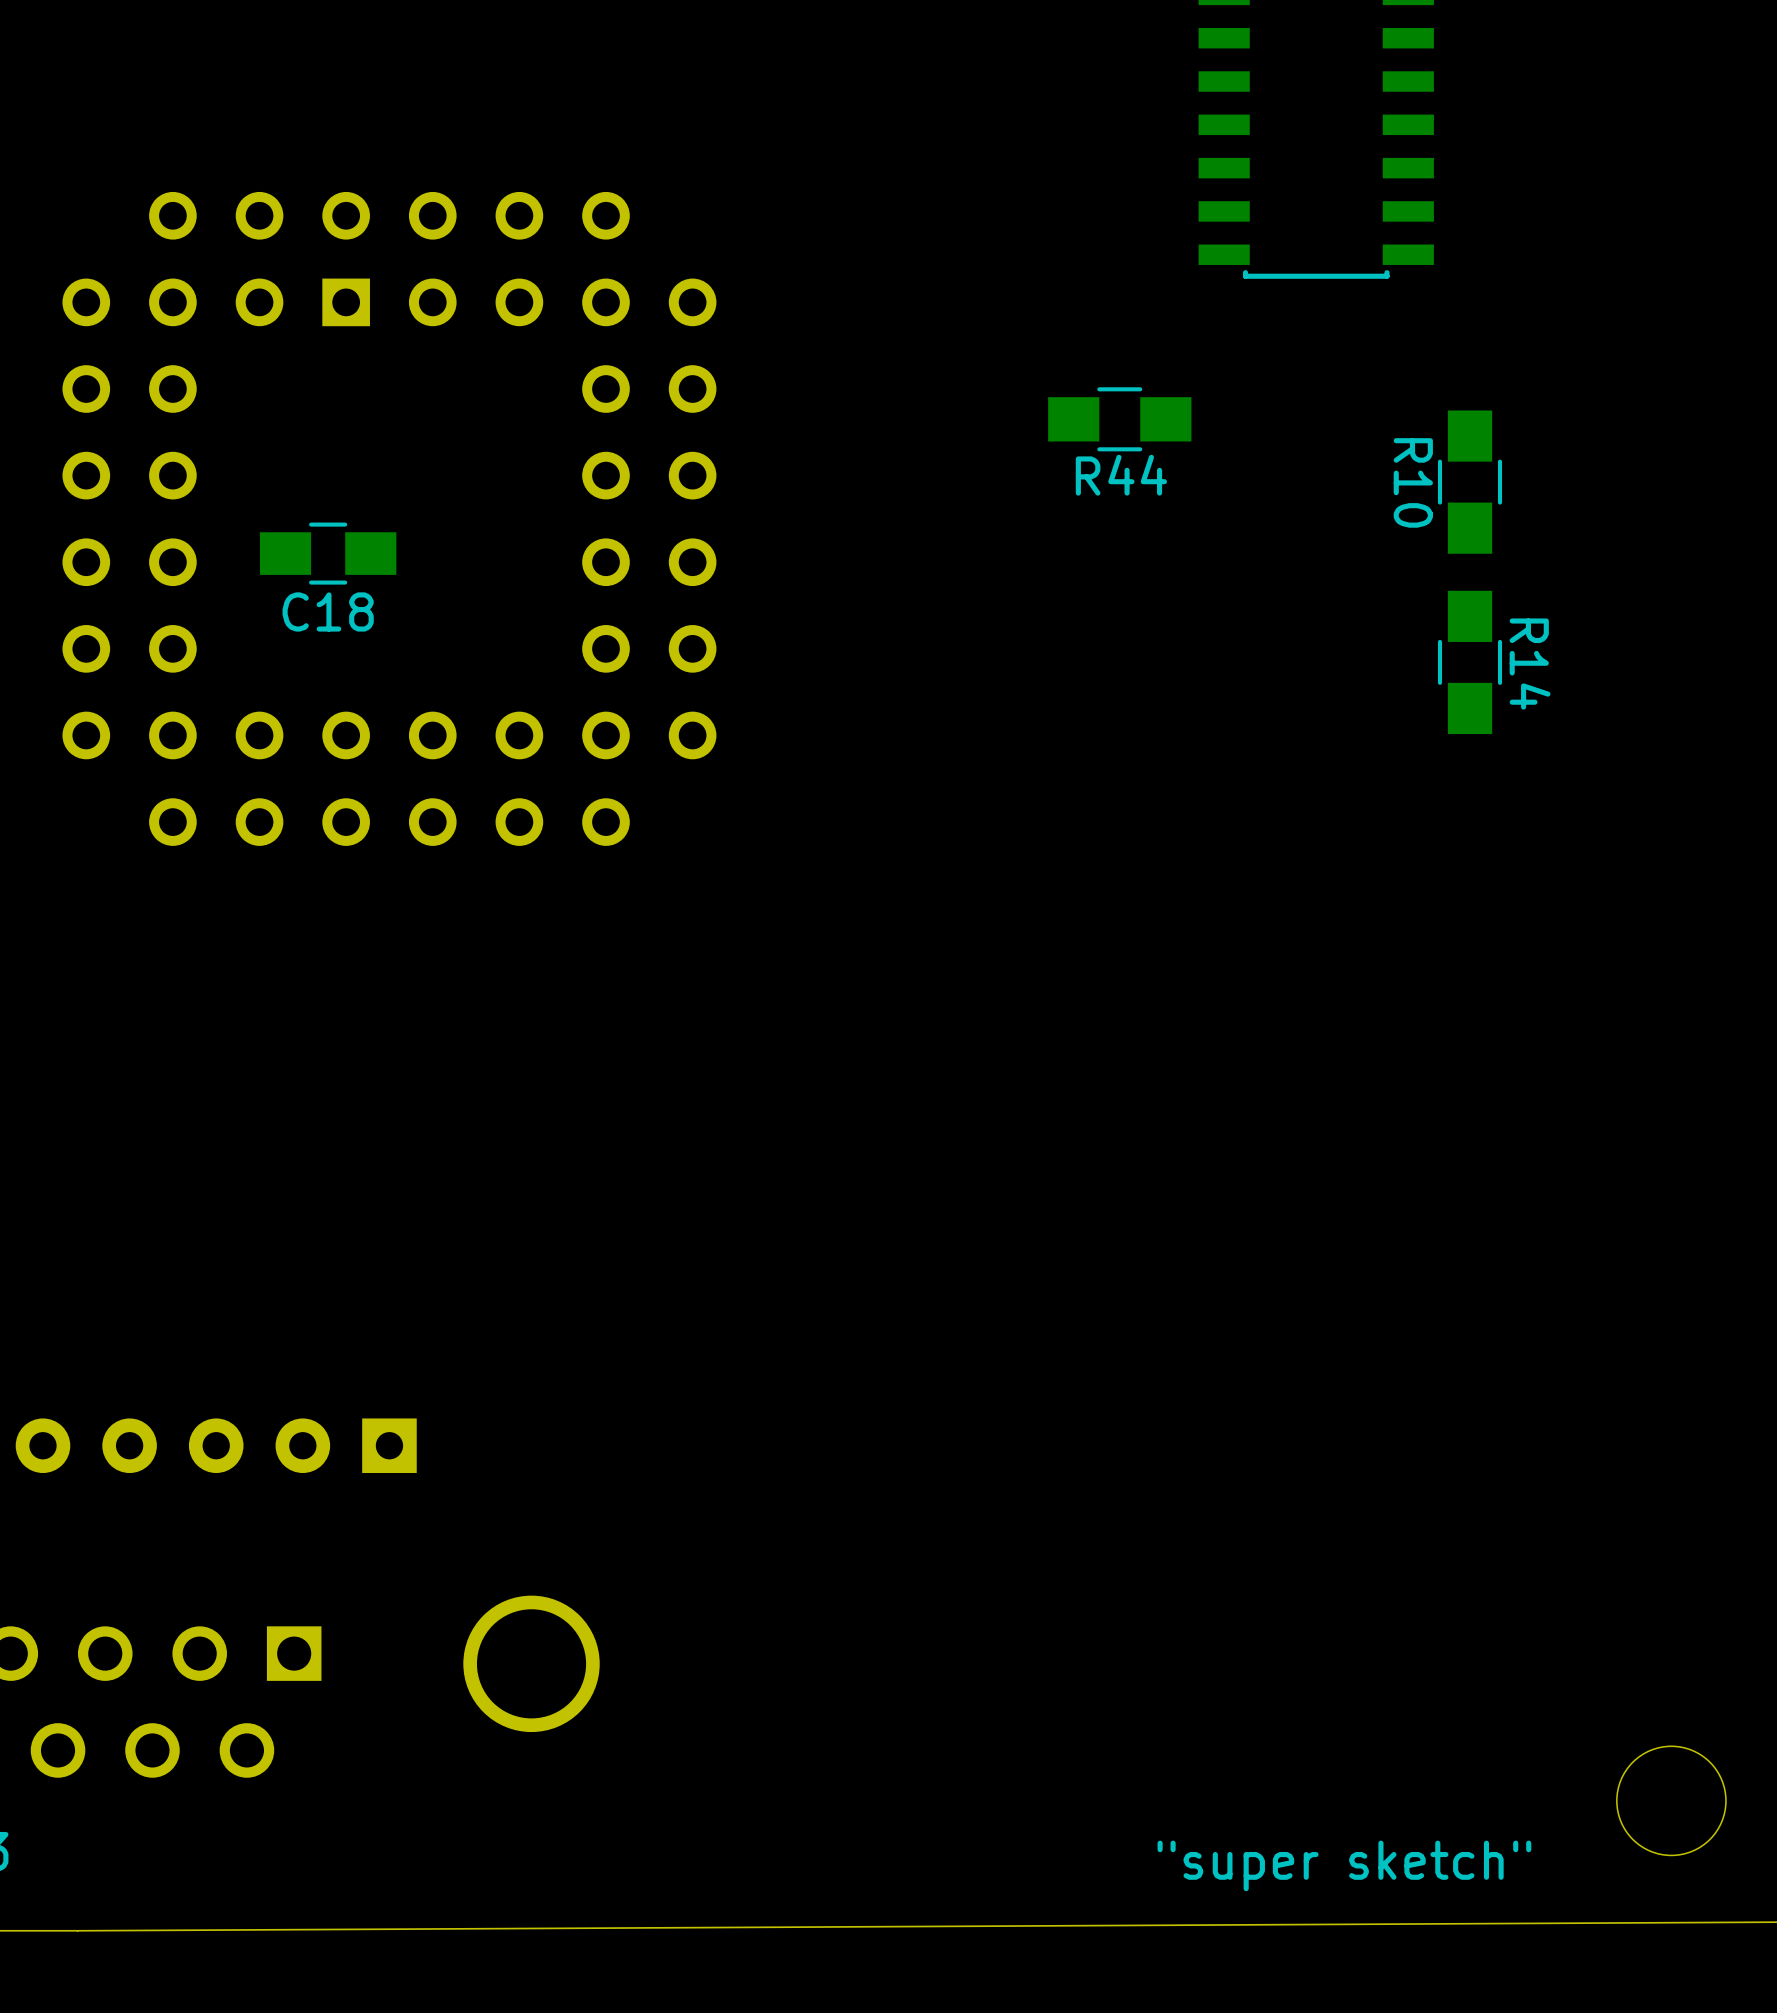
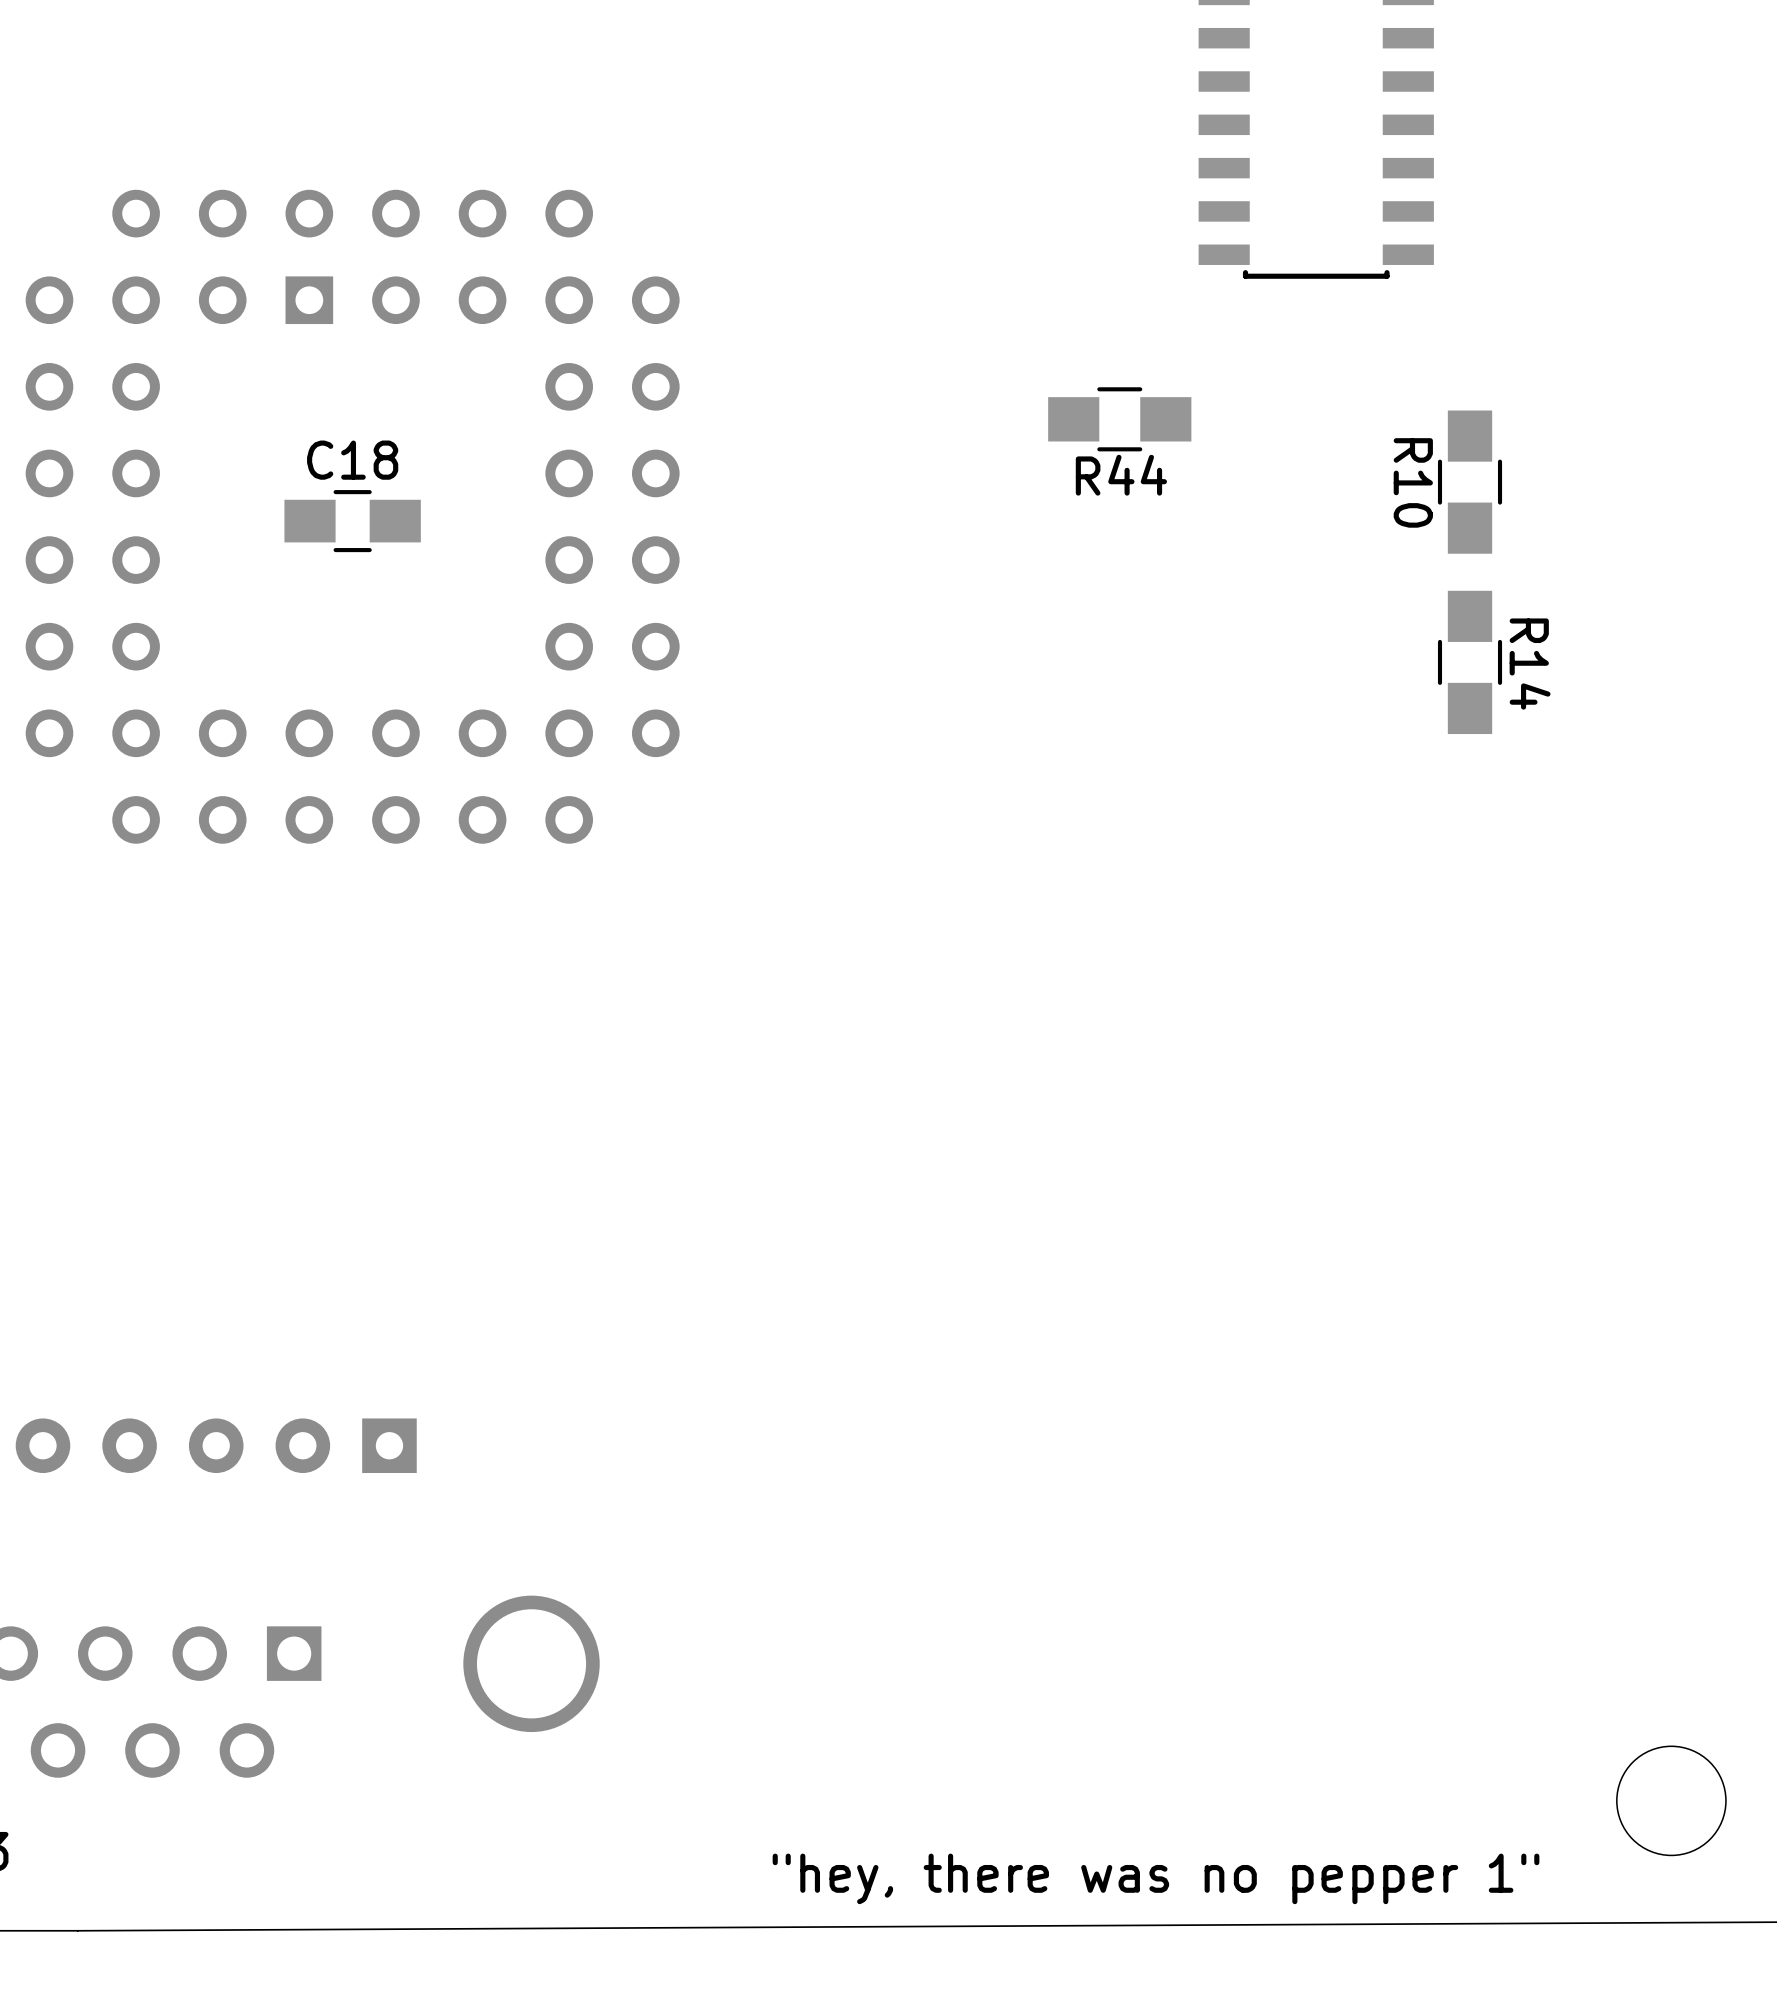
part position: (389, 518) -> (352, 516)
C18 position: (328, 553) -> (352, 521)
C18 name position: C18 (328, 611) -> C18 (352, 460)
text: "super sketch" (1344, 1865) -> none
text: none -> "hey, there was no pepper 1" (1156, 1878)

